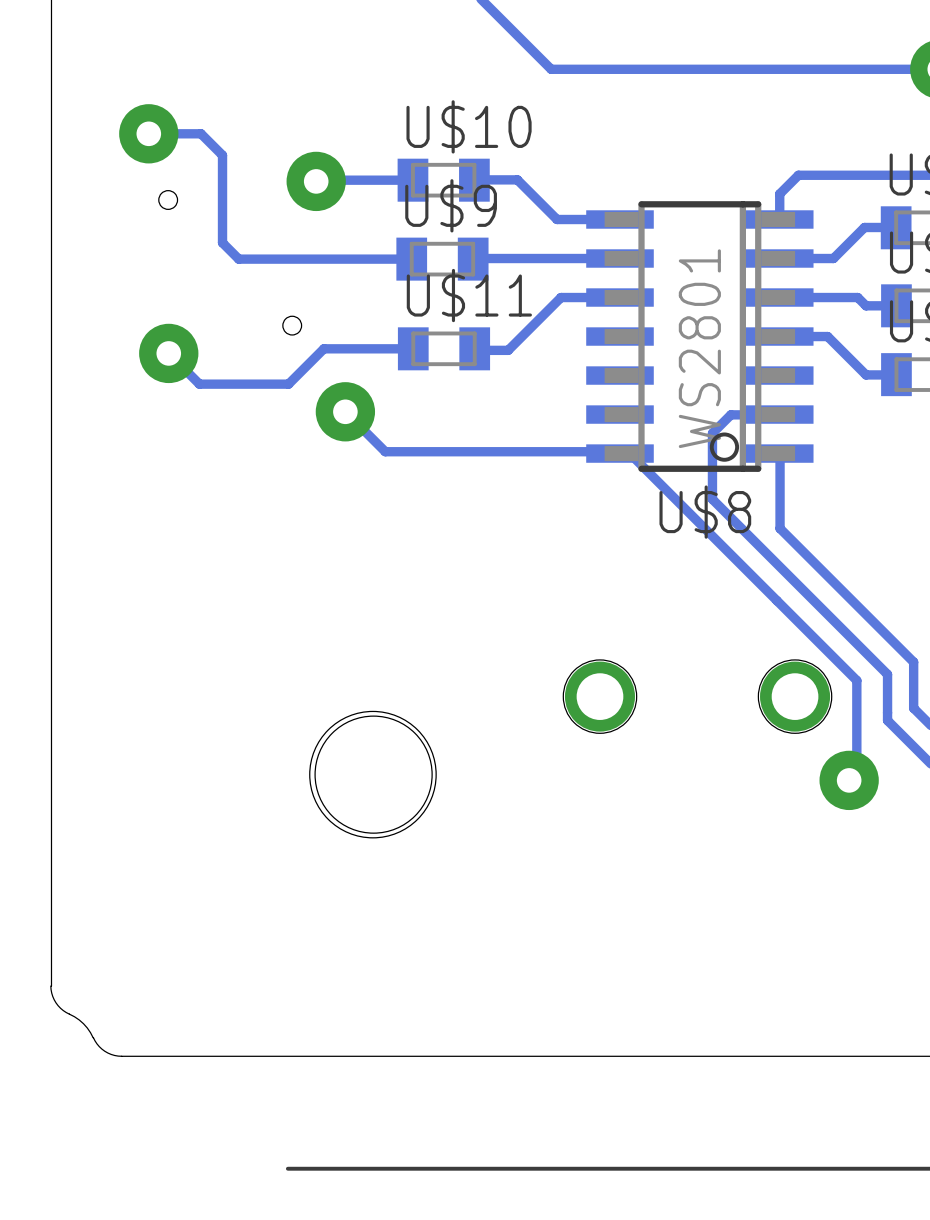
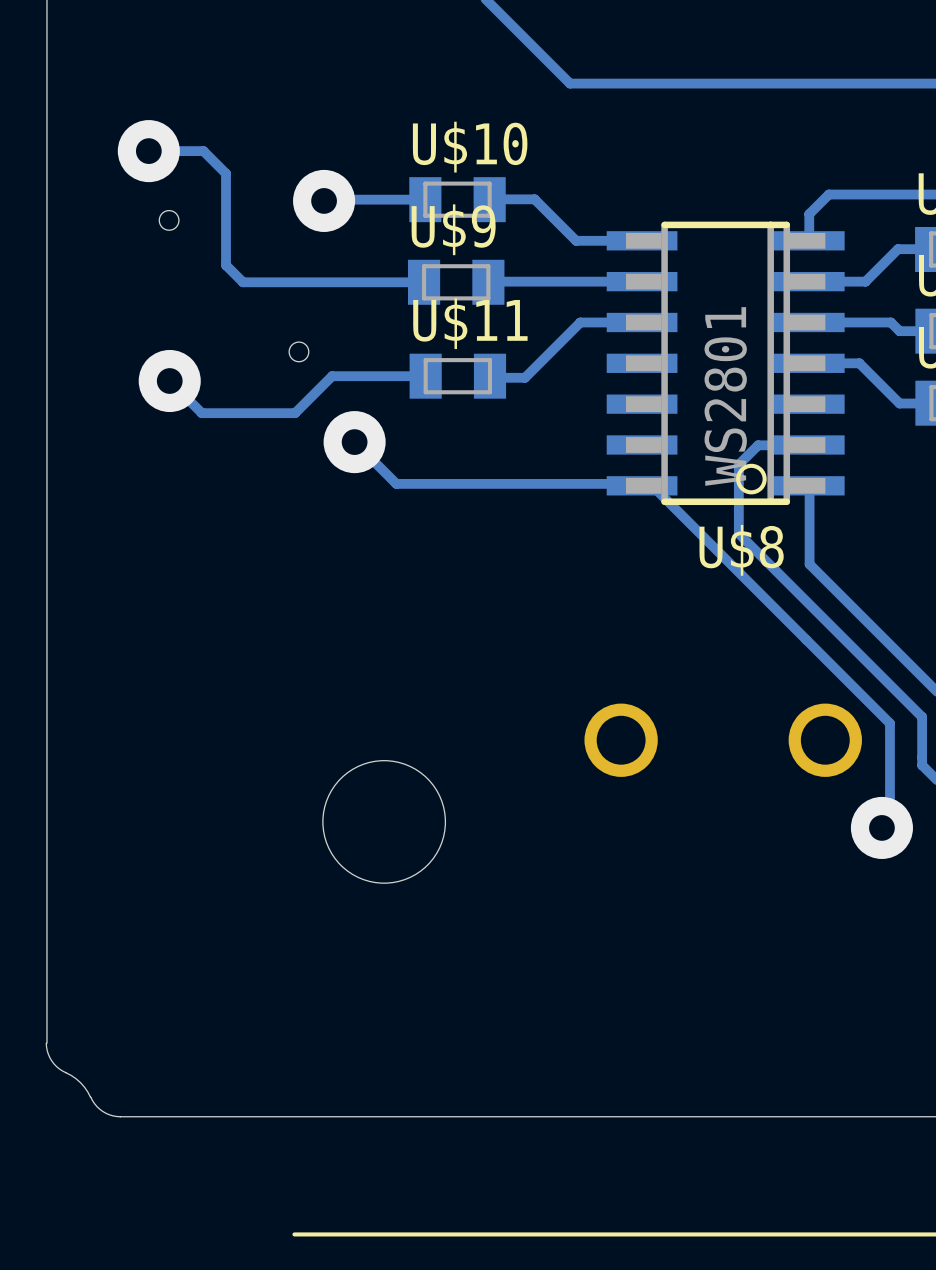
round board edge: [562, 659, 638, 734] -> none
round board edge: [757, 659, 833, 734] -> none
round board edge: [309, 711, 437, 839] -> none

